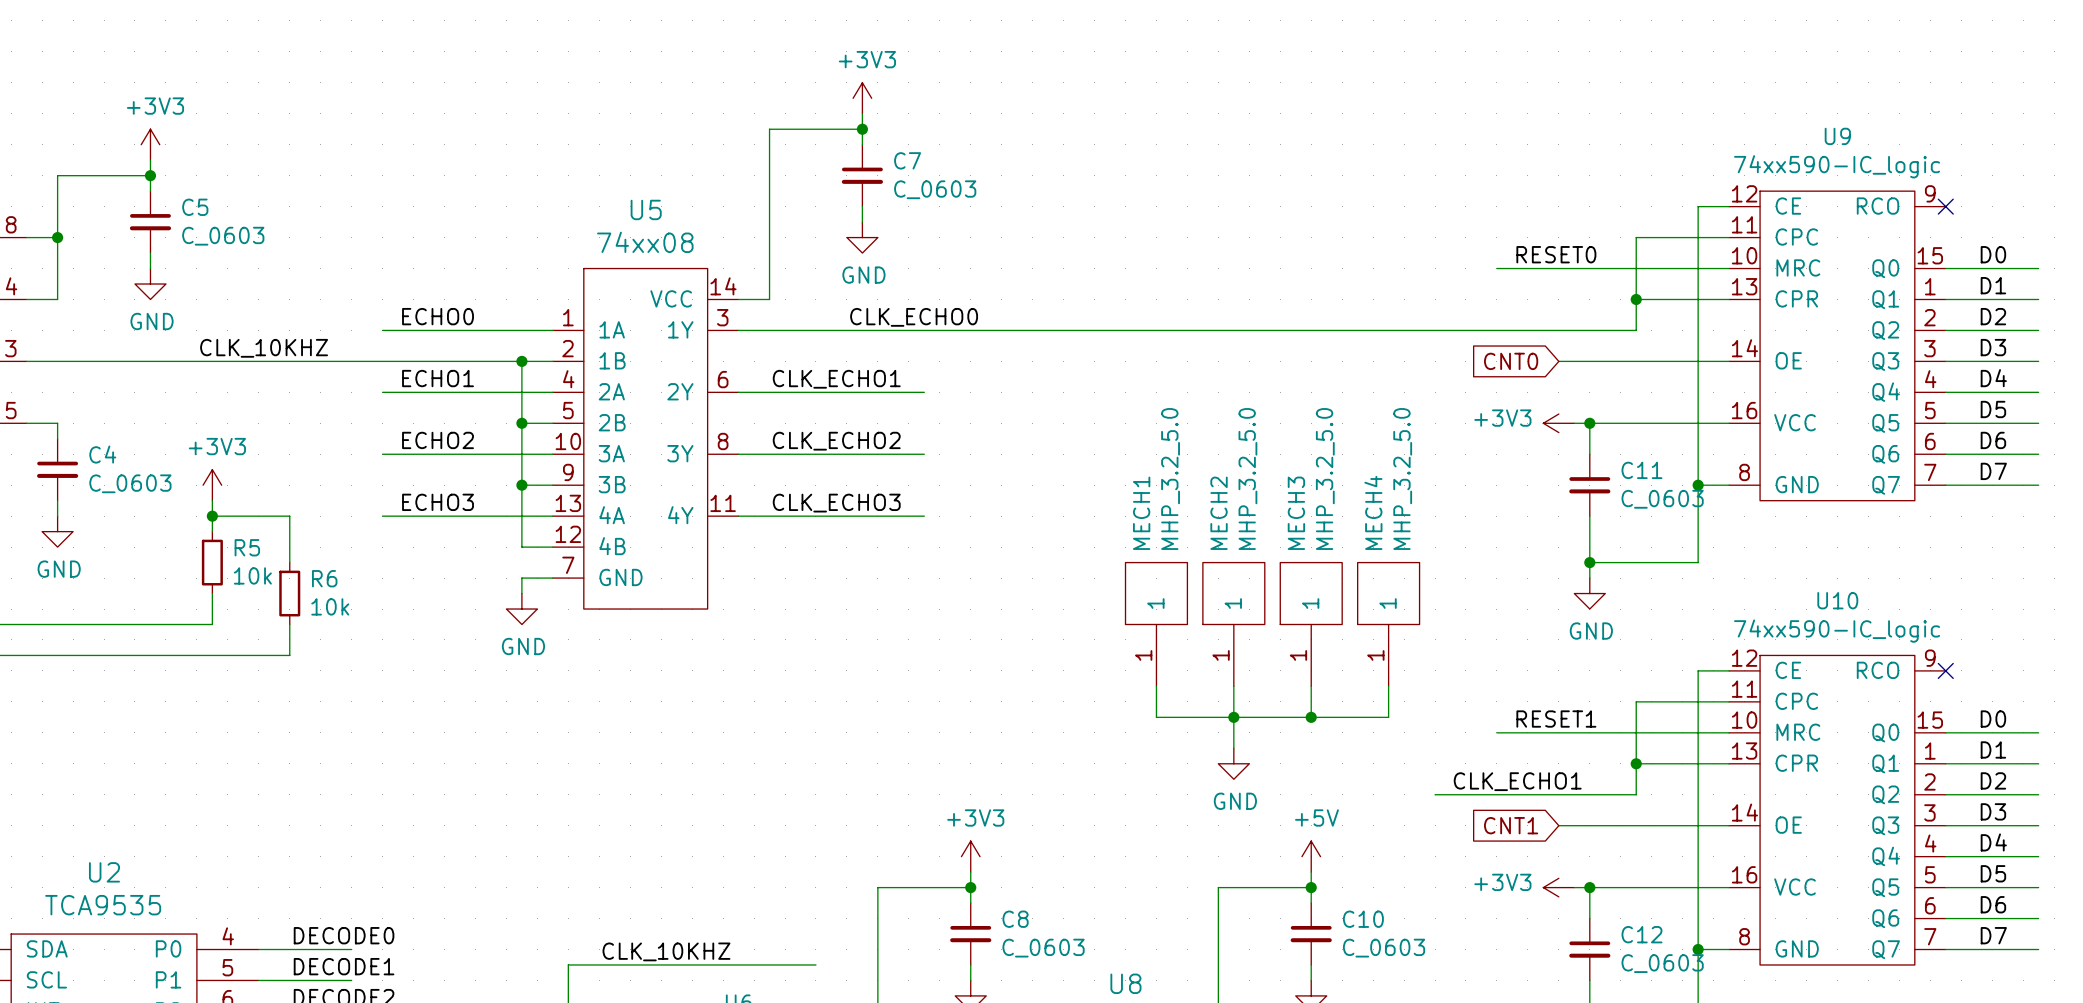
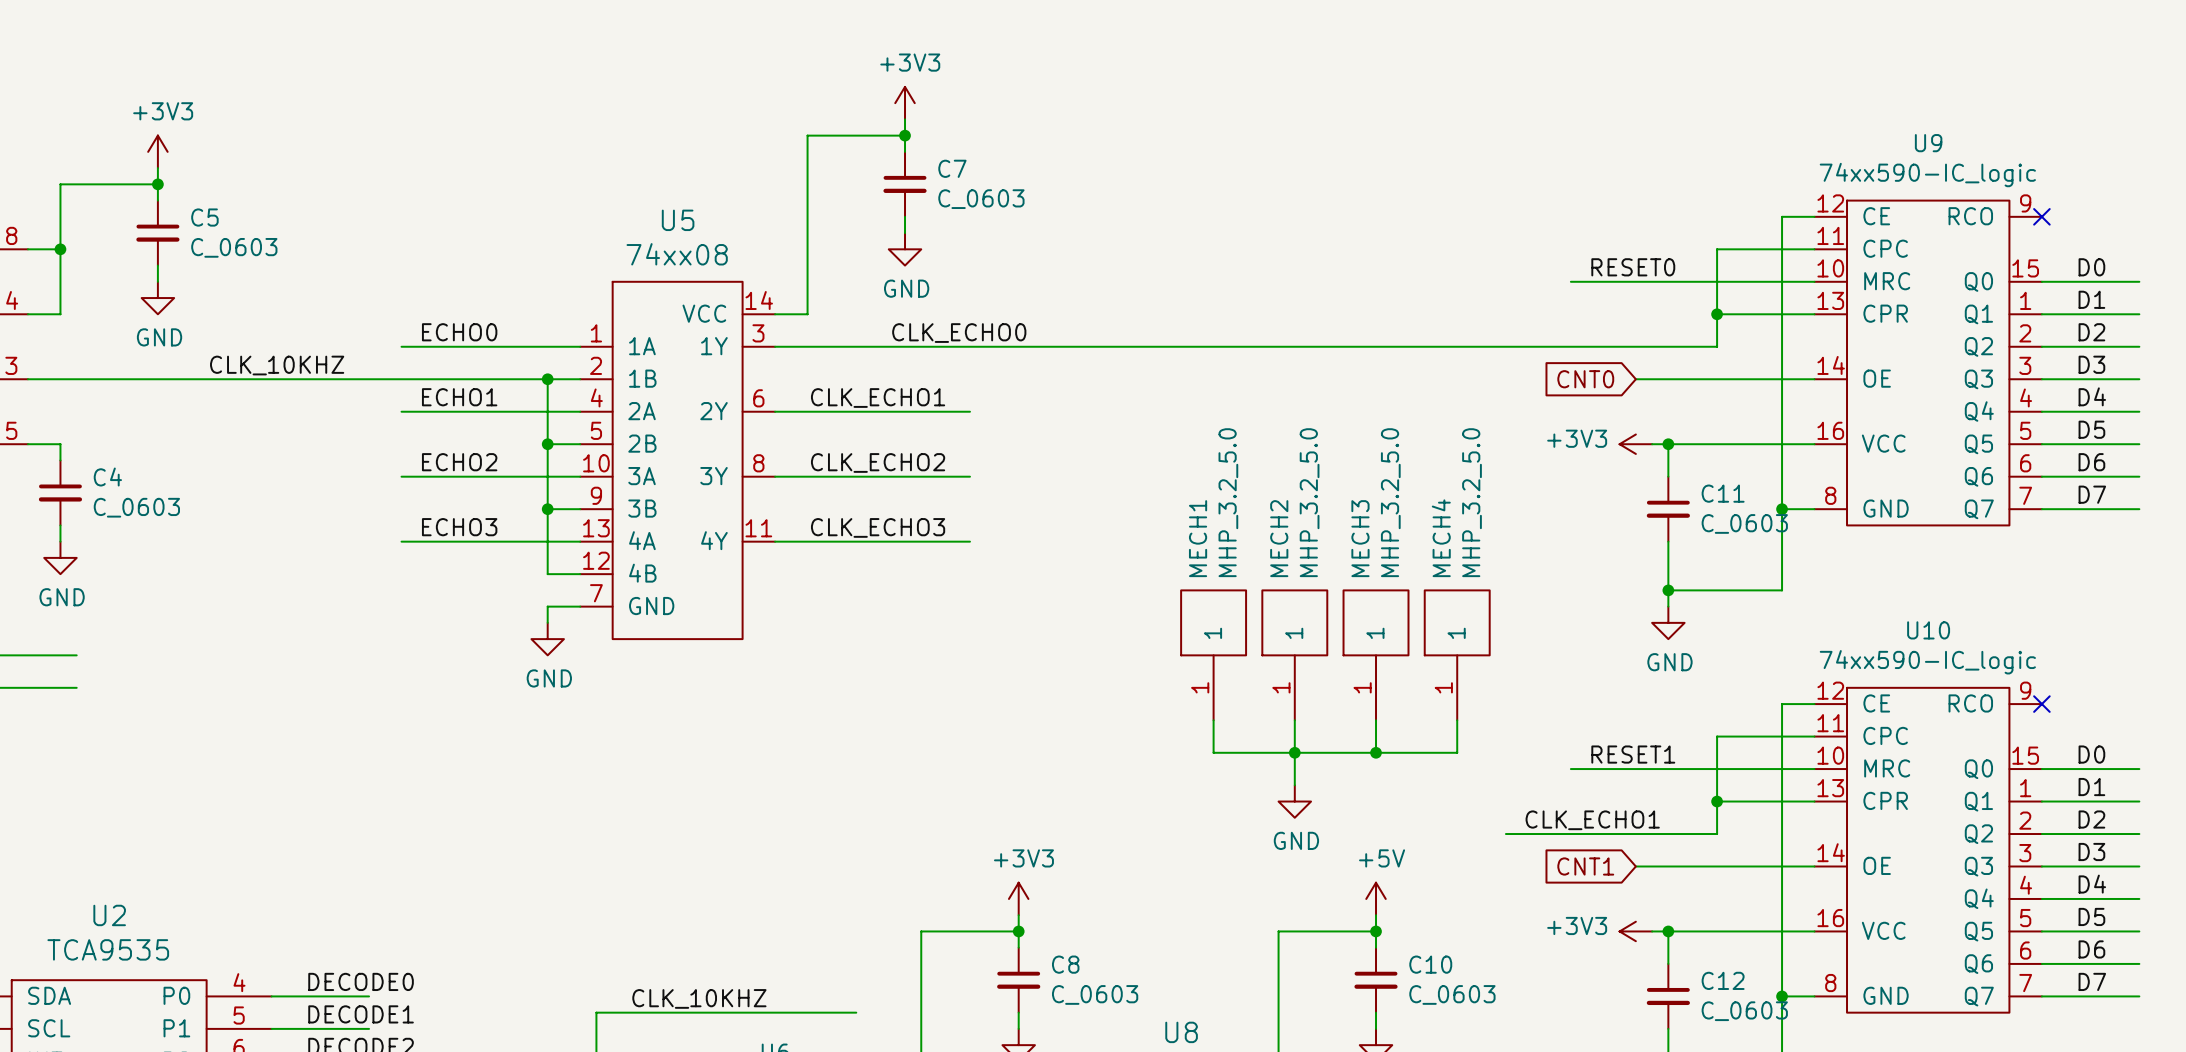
power symbol: +3V3 (212, 485) -> none
wire: (212, 500) (212, 531) -> none
wire: (212, 516) (289, 516) (289, 562) -> none
junction: (212, 516) -> none
R5: 10k (212, 562) -> none
wire: (212, 593) (212, 624) (73, 624) -> none
R6: 10k (289, 593) -> none
wire: (289, 624) (289, 655) (73, 655) -> none

